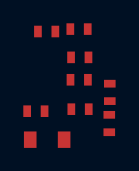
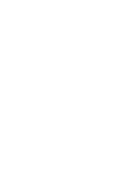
part: (79, 29) -> none
part: (46, 31) -> none
part: (79, 57) -> none
part: (79, 79) -> none
part: (109, 92) -> none
part: (80, 109) -> none
part: (35, 111) -> none
part: (109, 123) -> none
part: (47, 139) -> none

